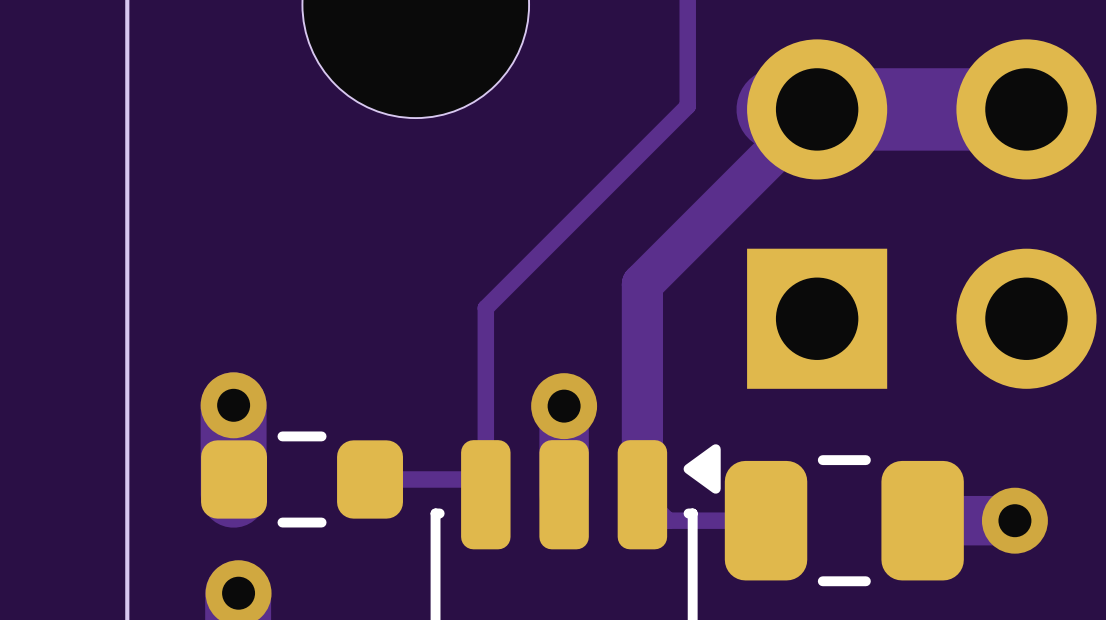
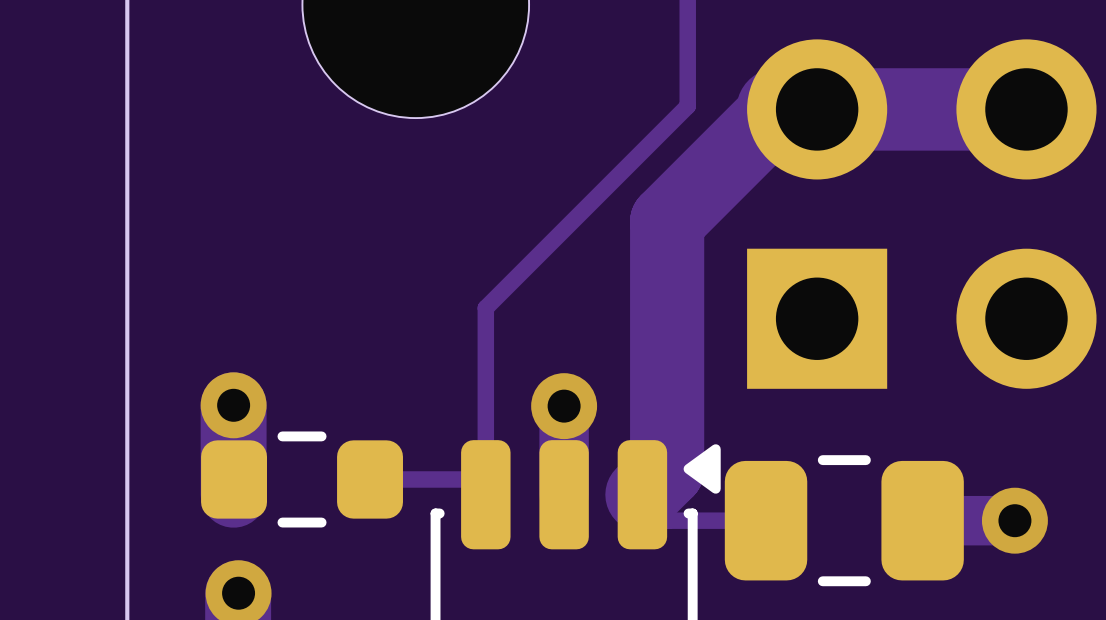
track: (817, 109) (642, 284) (642, 494) -> (779, 109) (667, 221) (667, 470) (642, 494)

